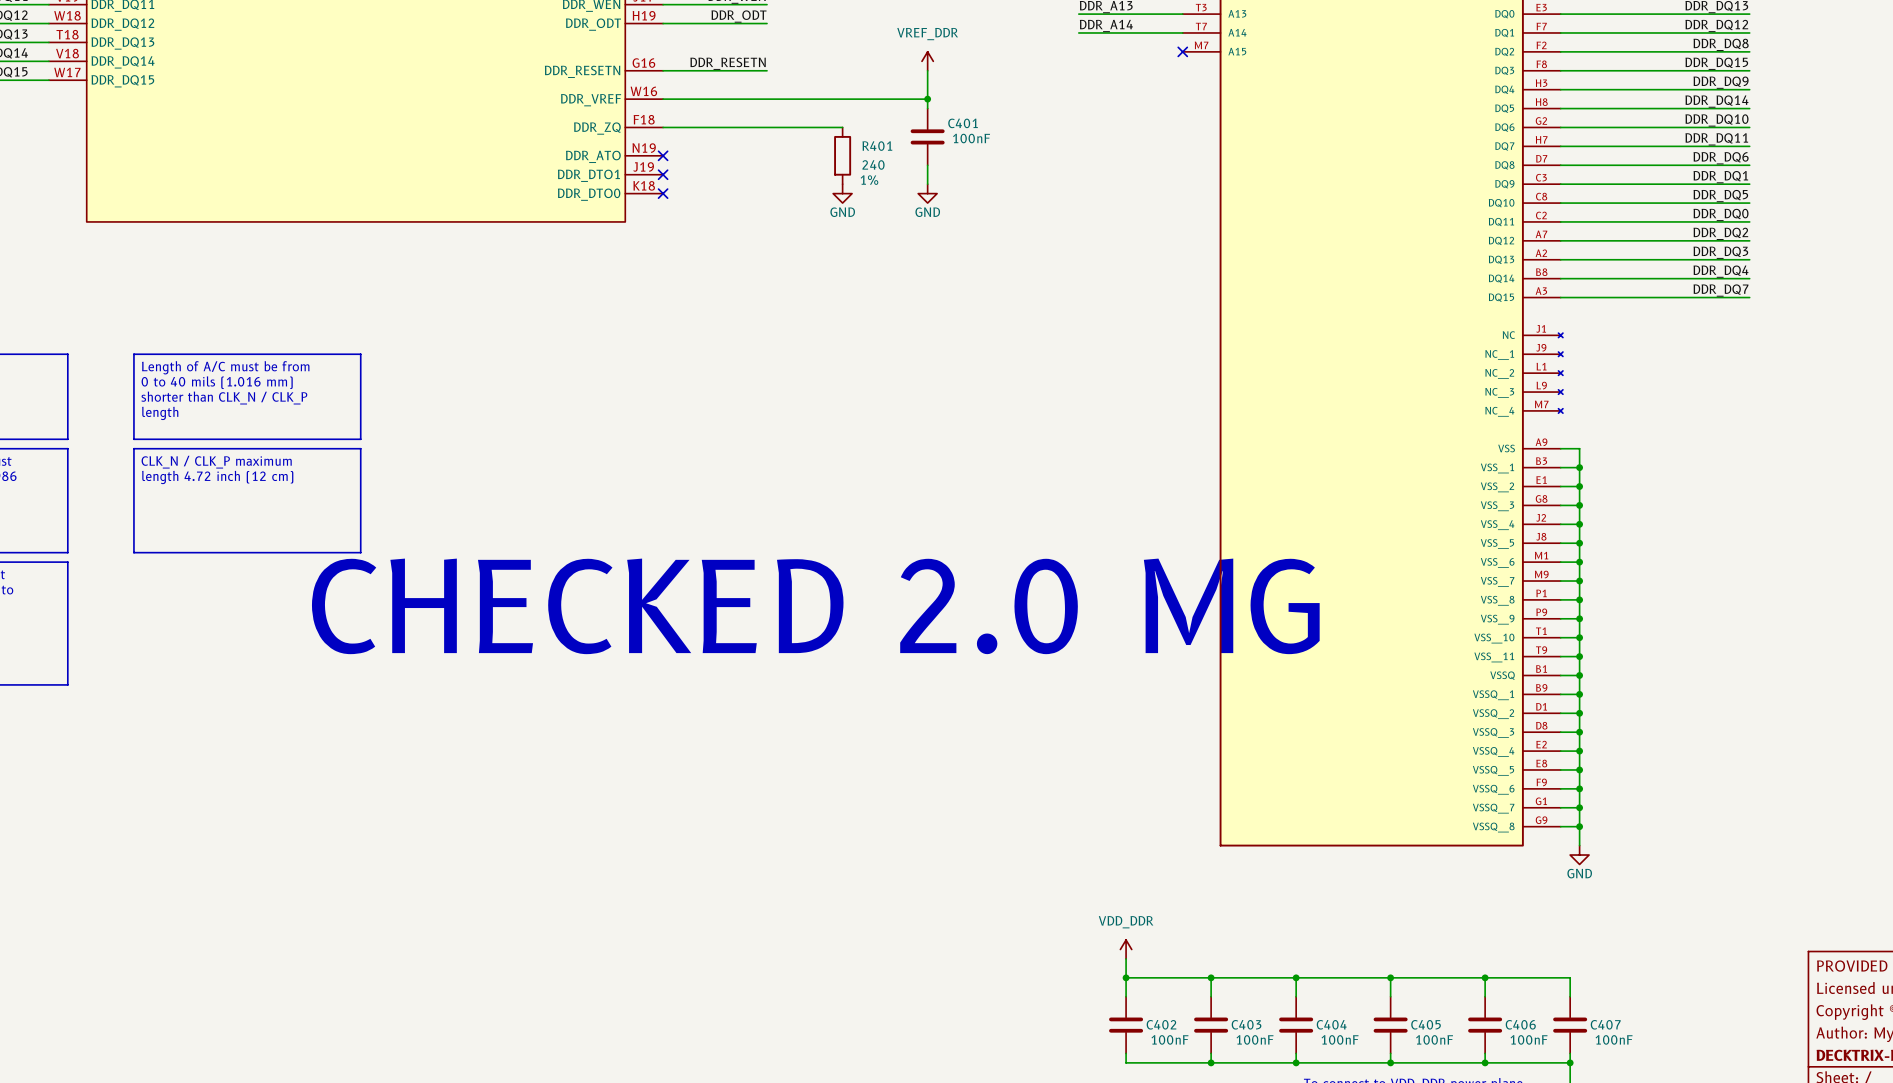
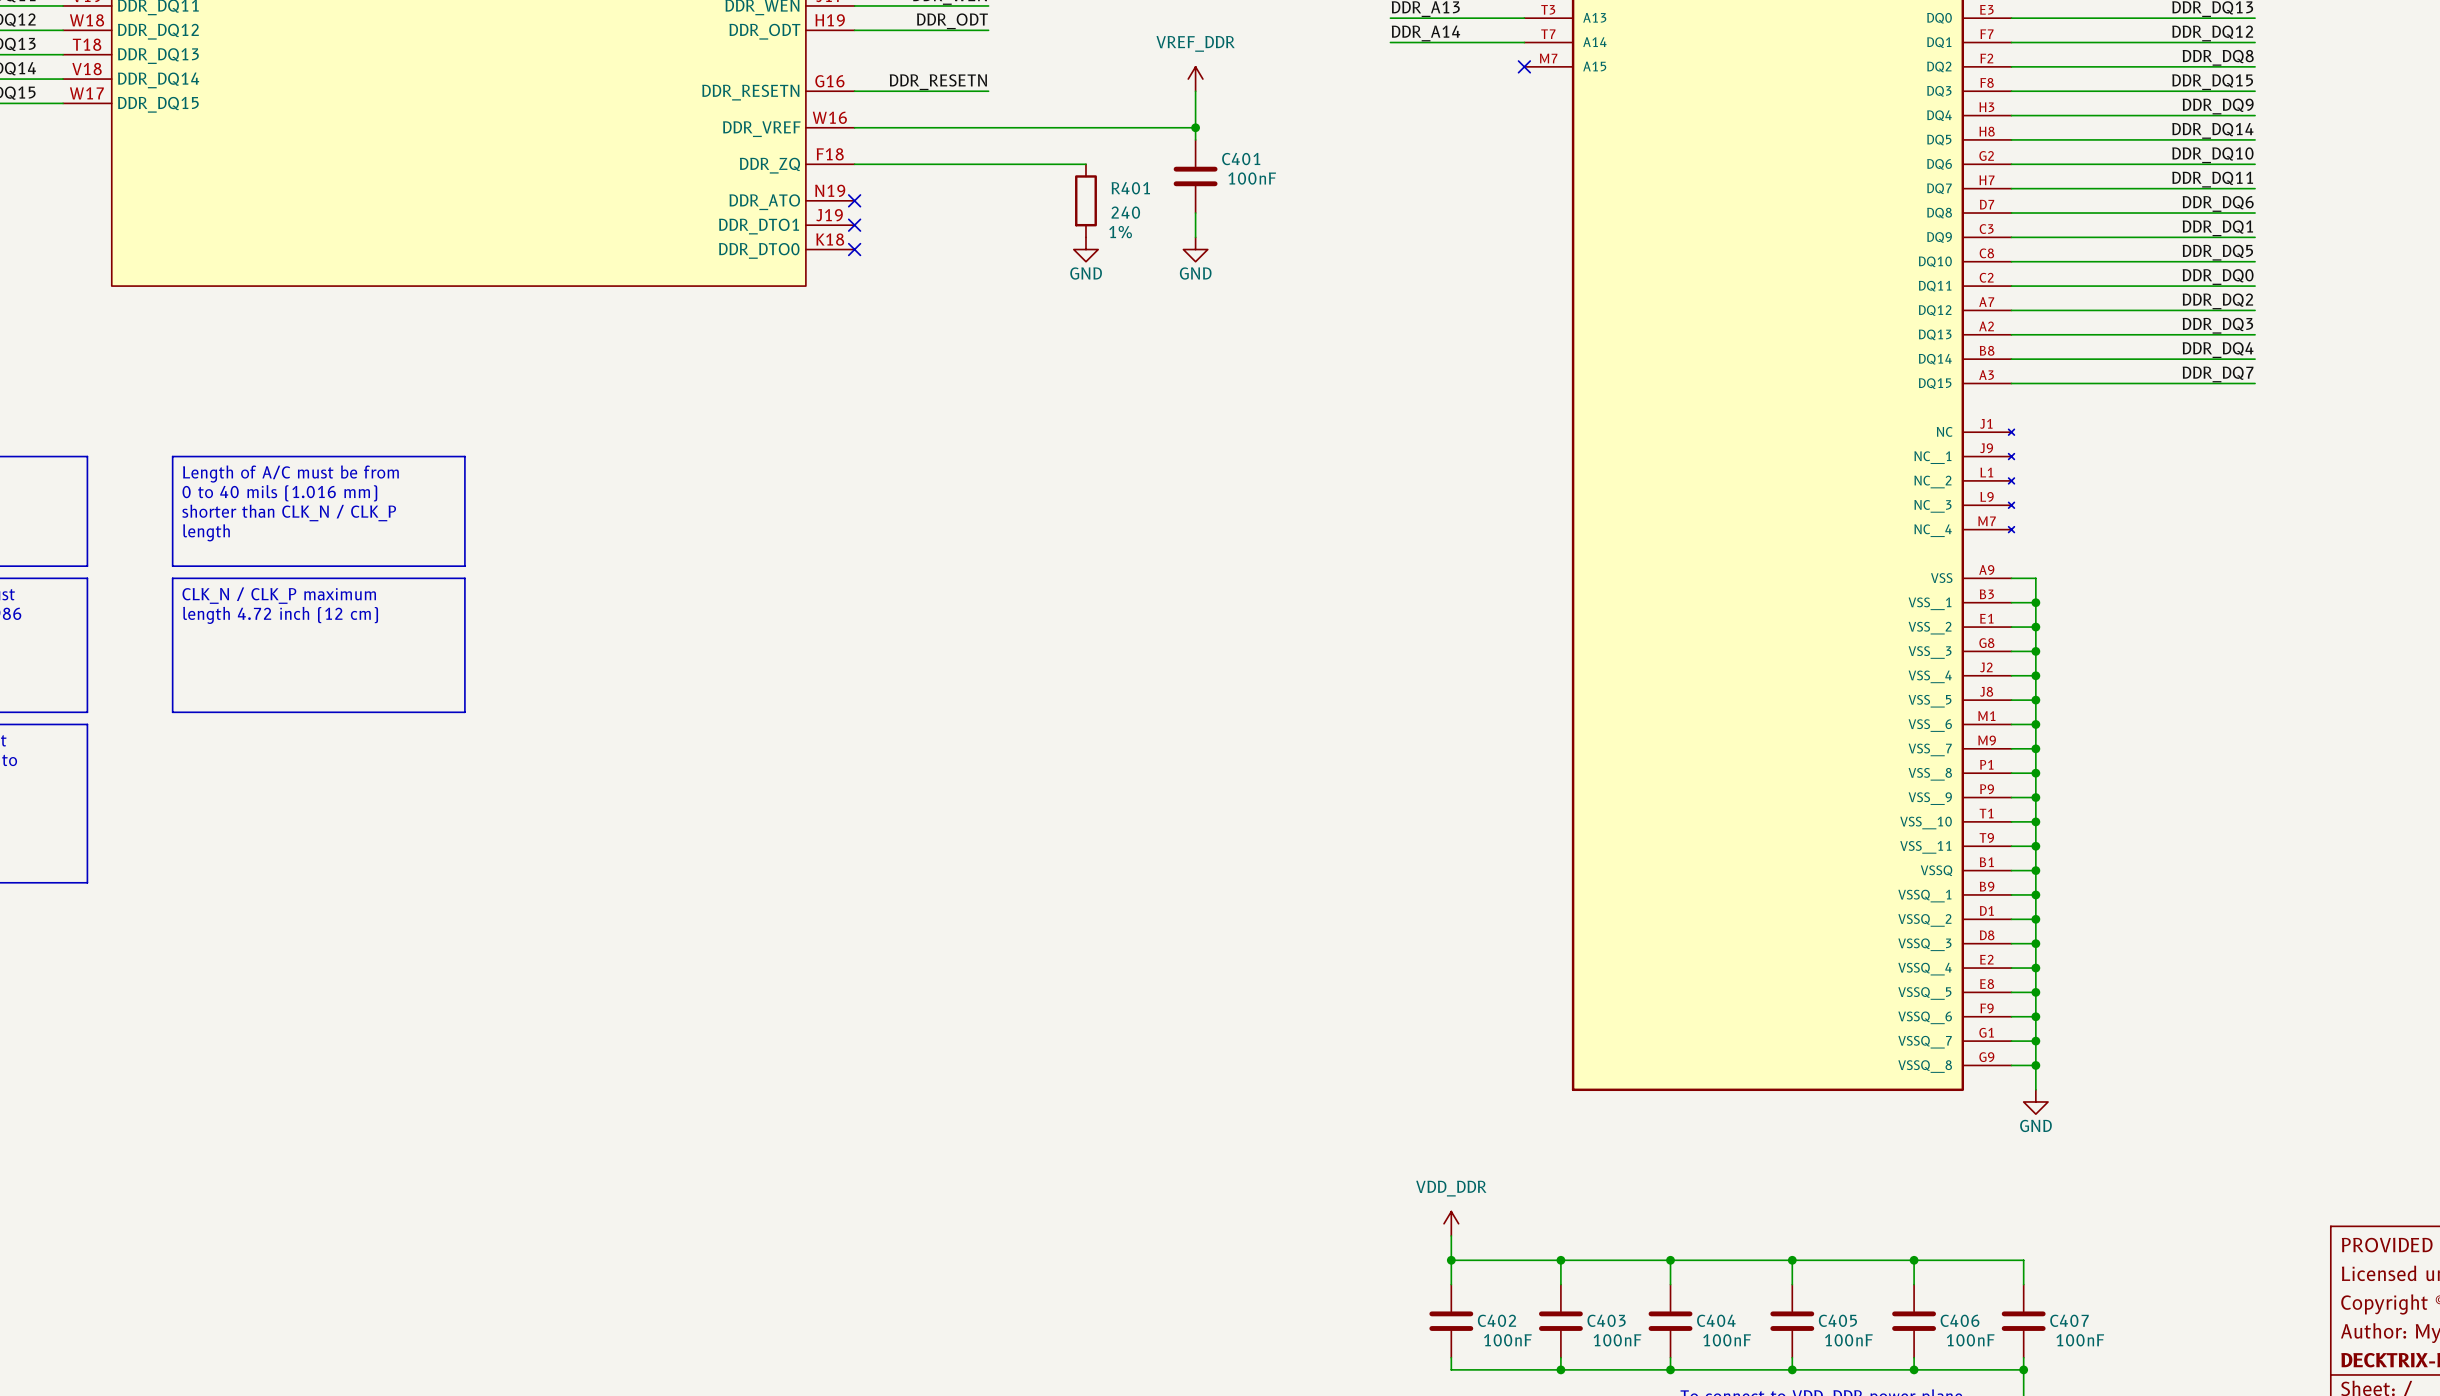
text: CHECKED 2.0 MG (815, 606) -> none

